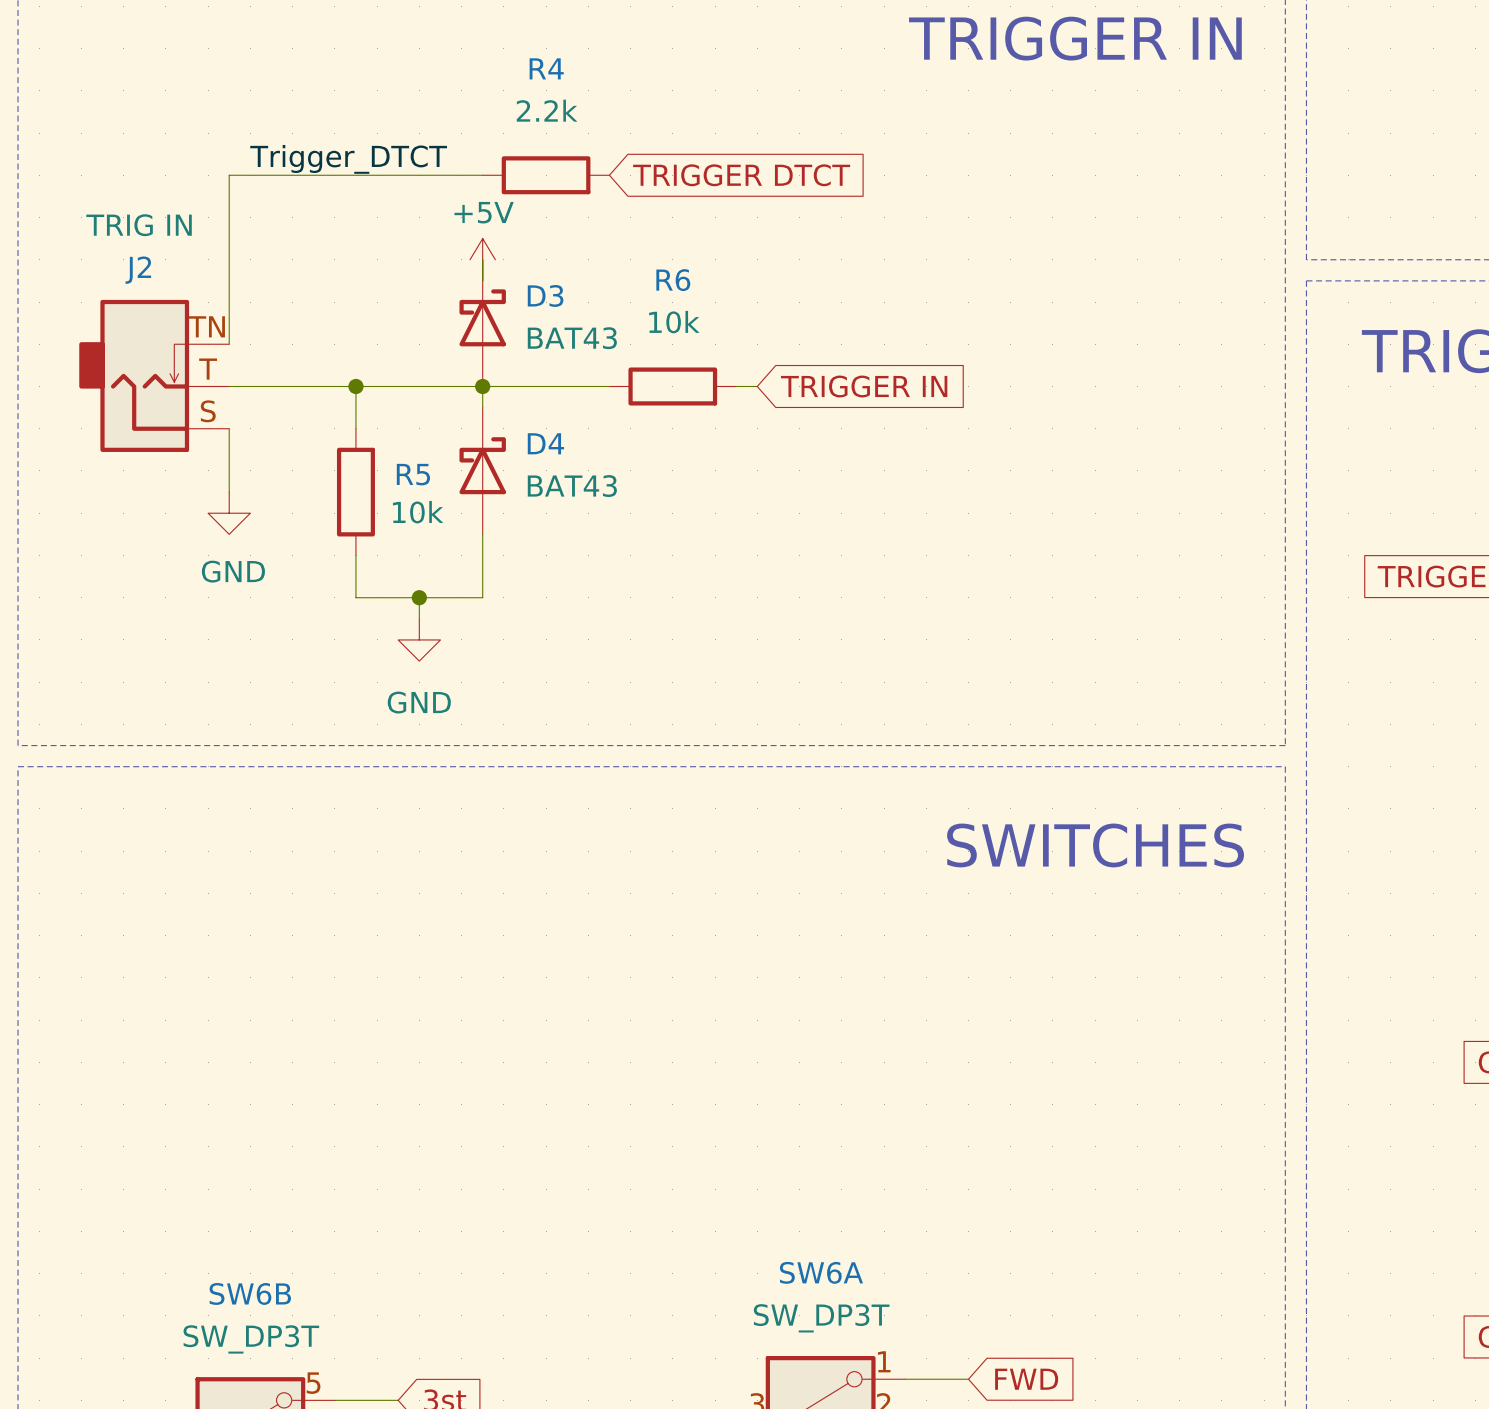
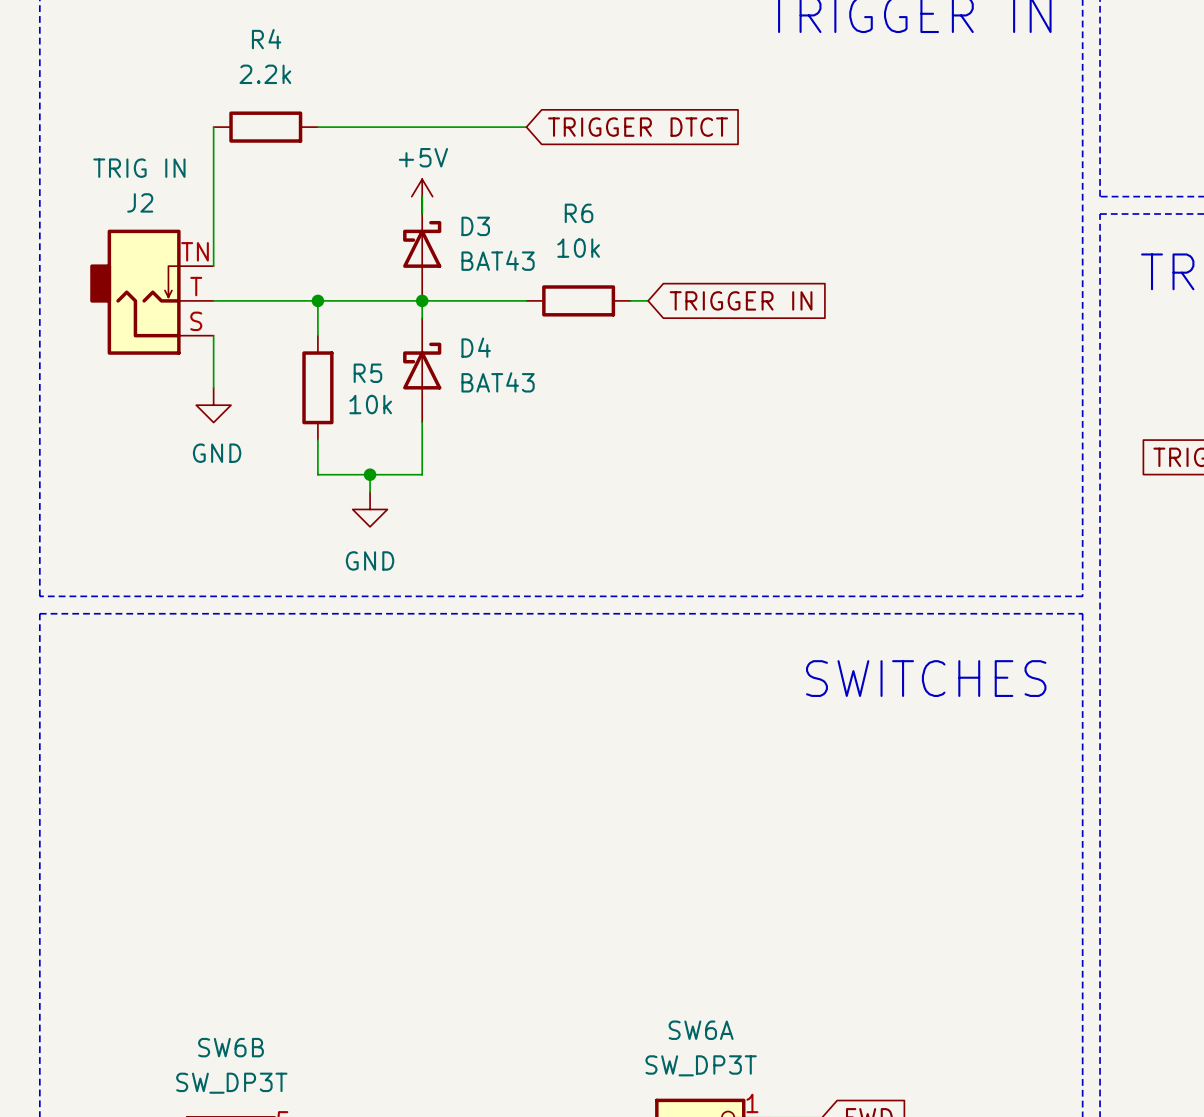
label: Trigger_DTCT (348, 159) -> none
wire: (229, 175) (355, 175) -> (422, 127) (526, 127)
R4 position: (546, 175) -> (265, 127)

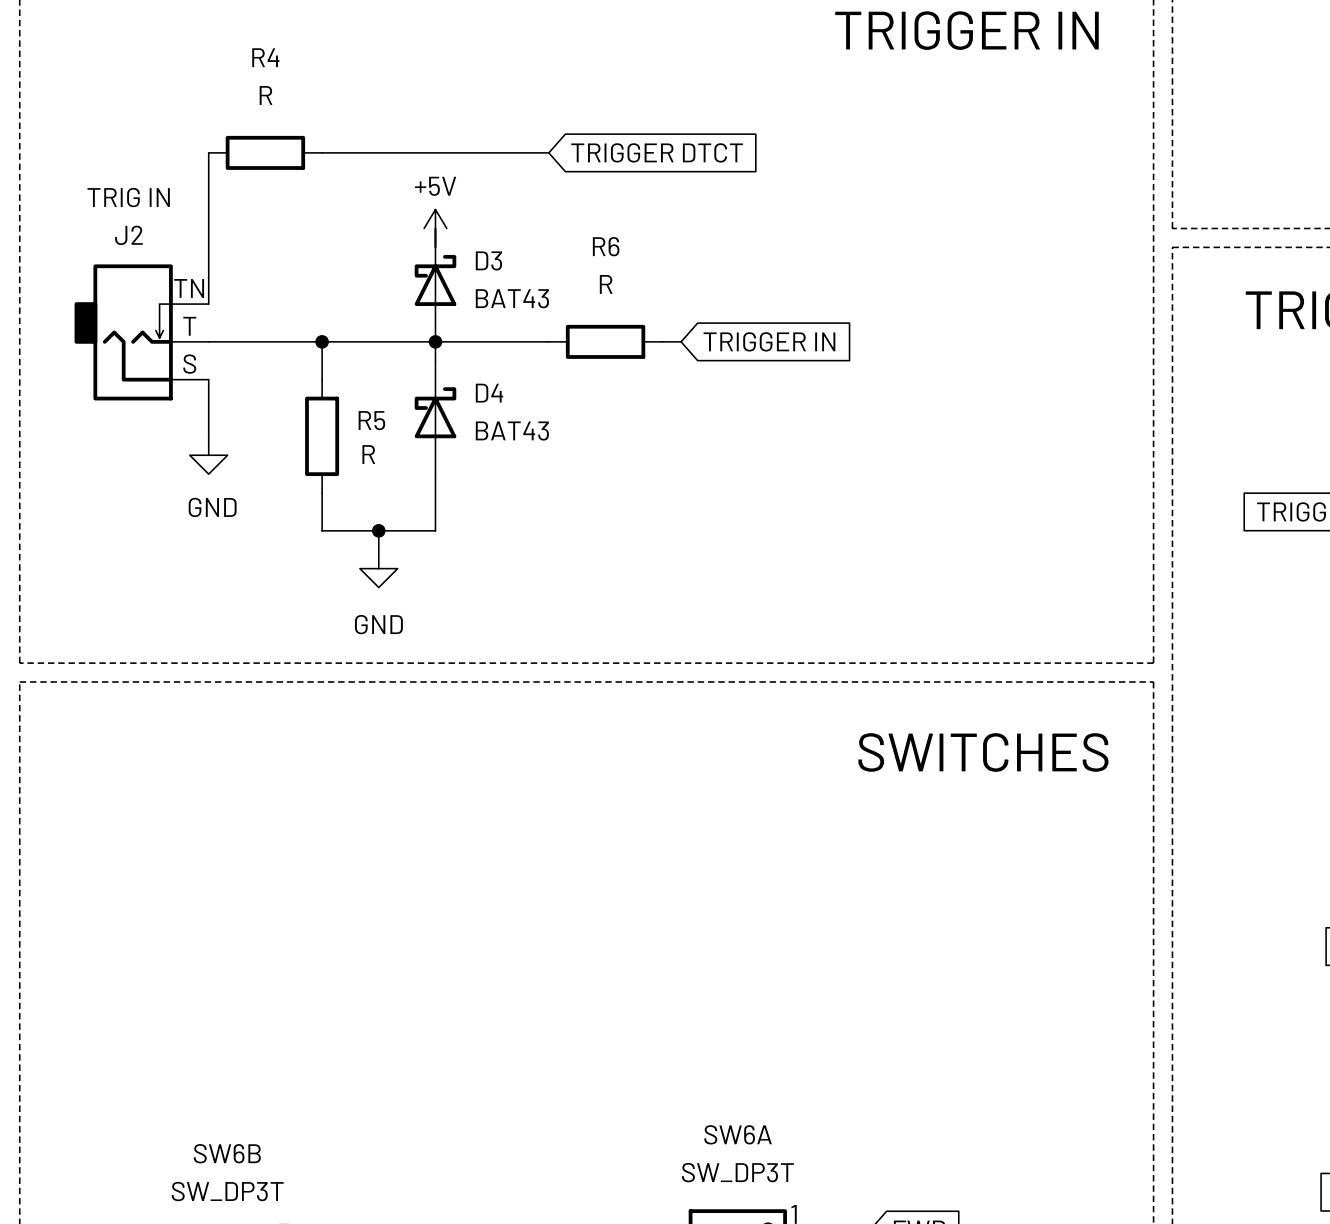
R4 value: 2.2k (265, 74) -> R (266, 95)
R6 value: 10k (578, 248) -> R (606, 284)
R5 value: 10k (370, 404) -> R (368, 454)

